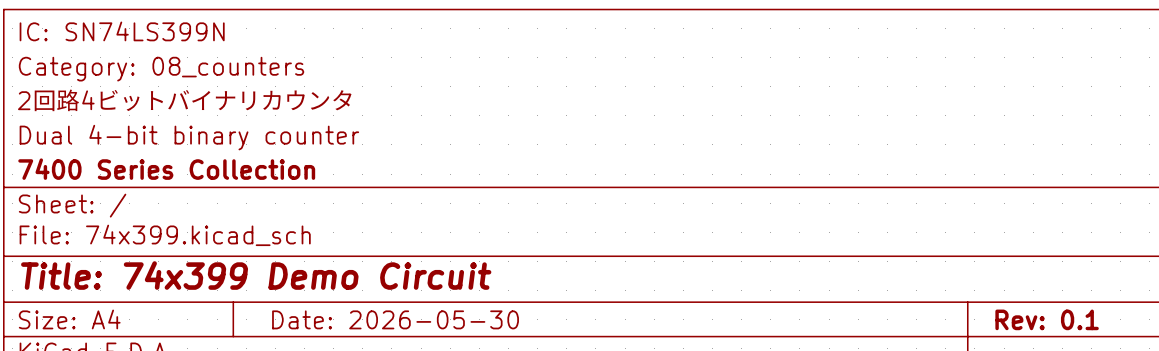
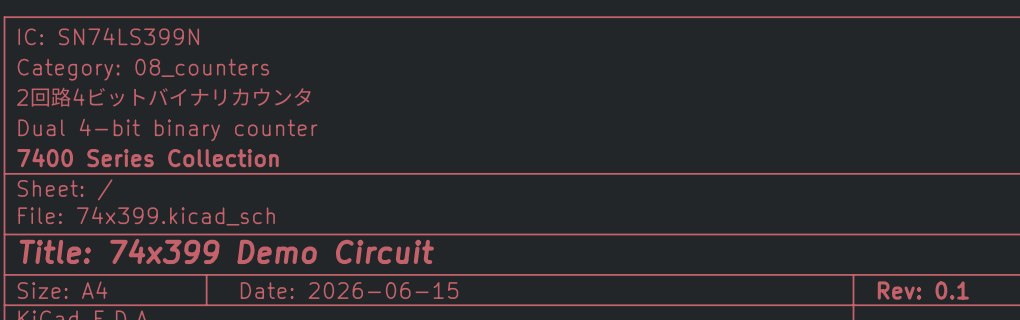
title block: Date: 2026-05-30 (395, 319) -> Date: 2026-06-15 (349, 290)

